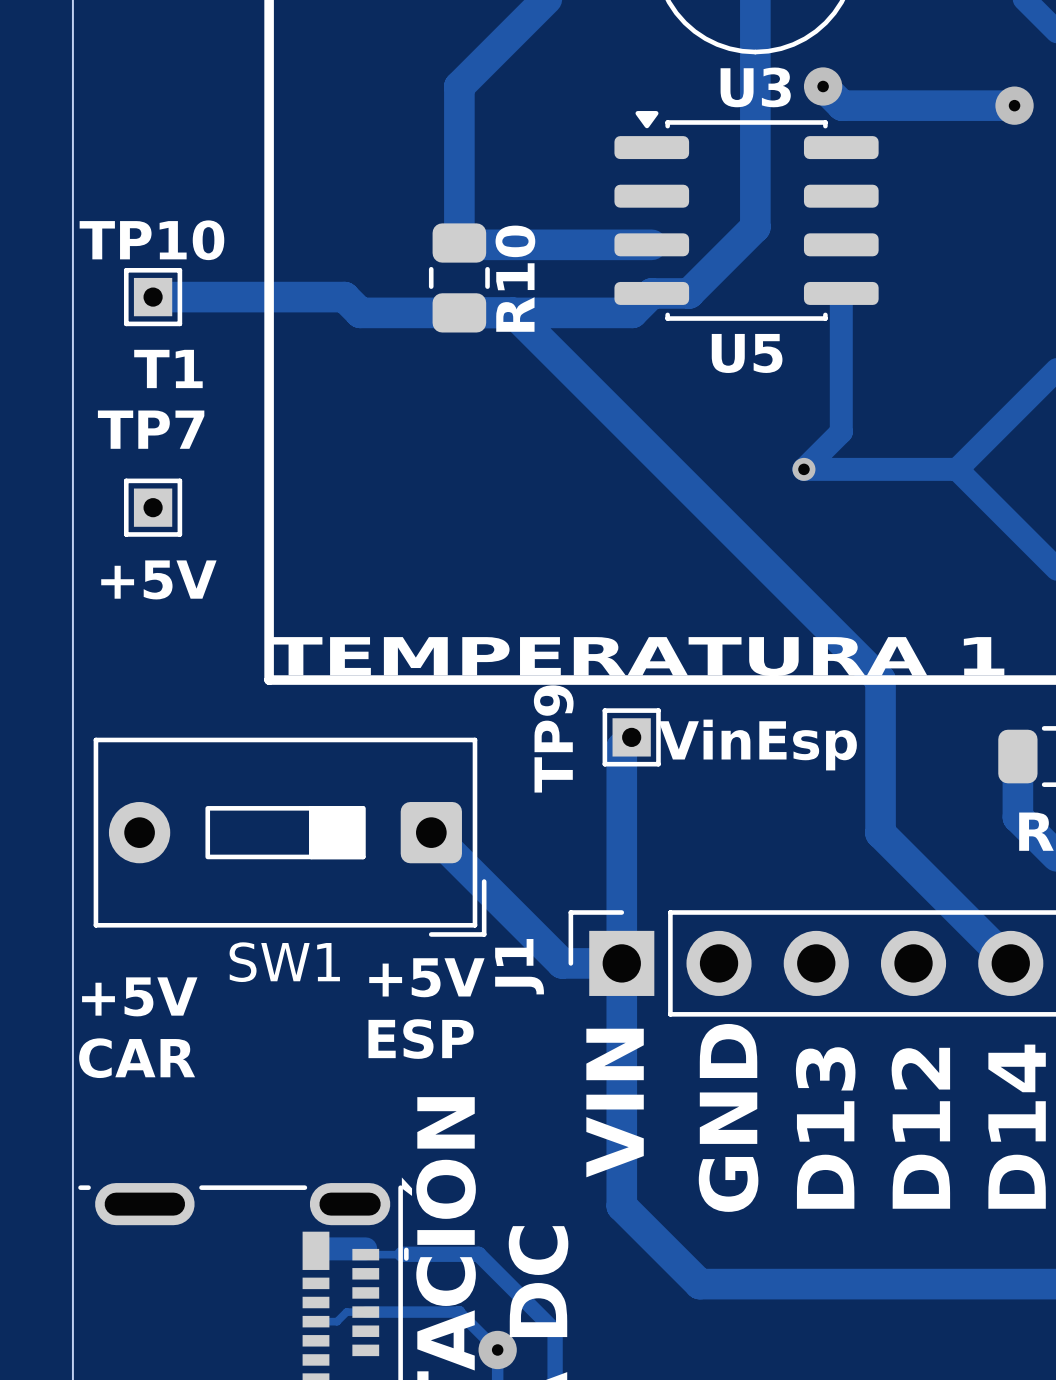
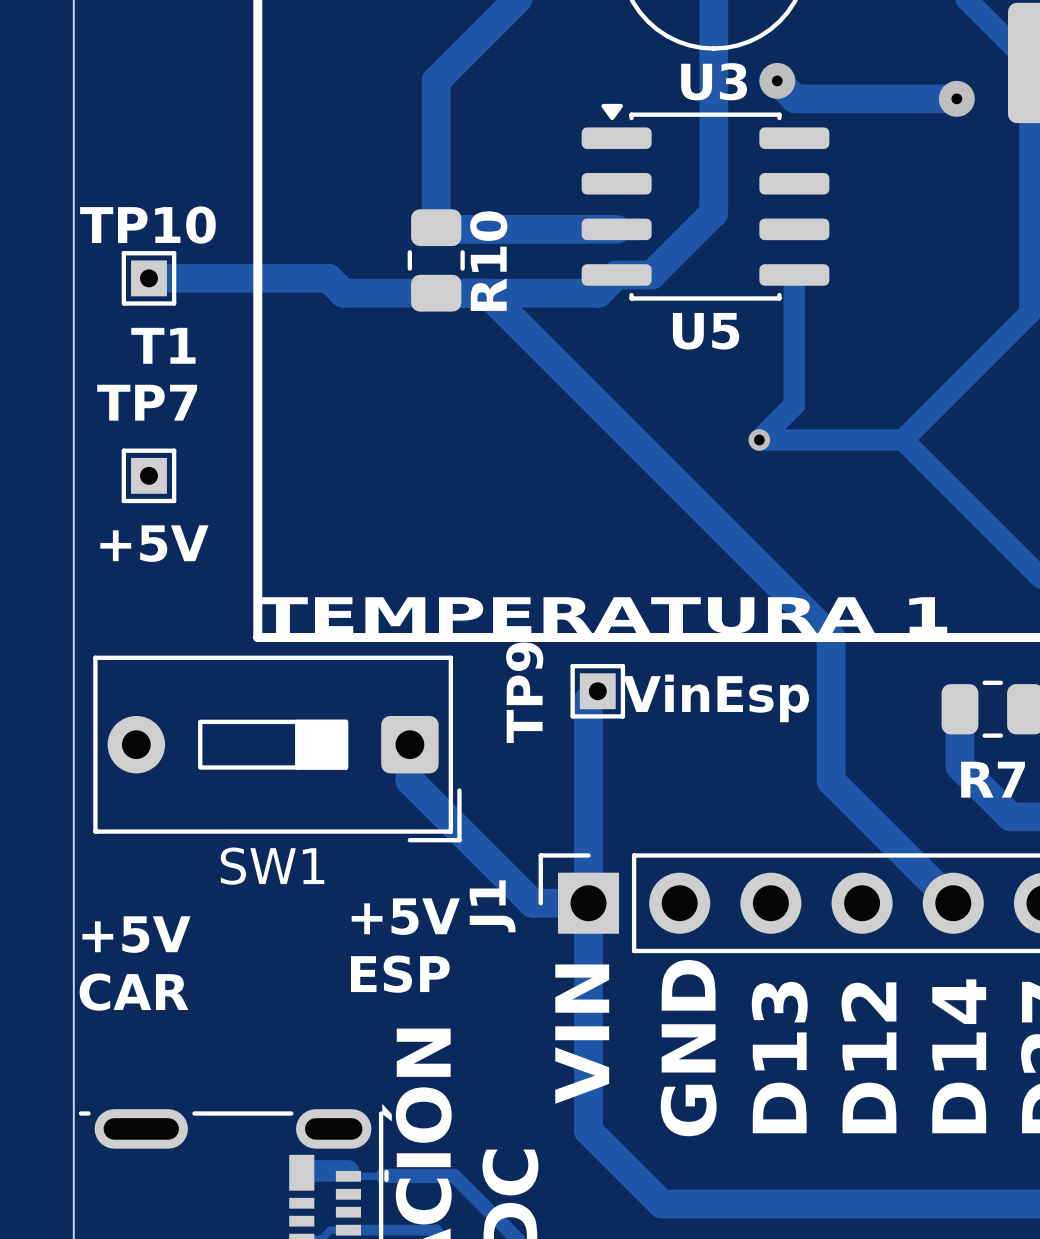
SW1 position: (290, 837) -> (277, 748)

